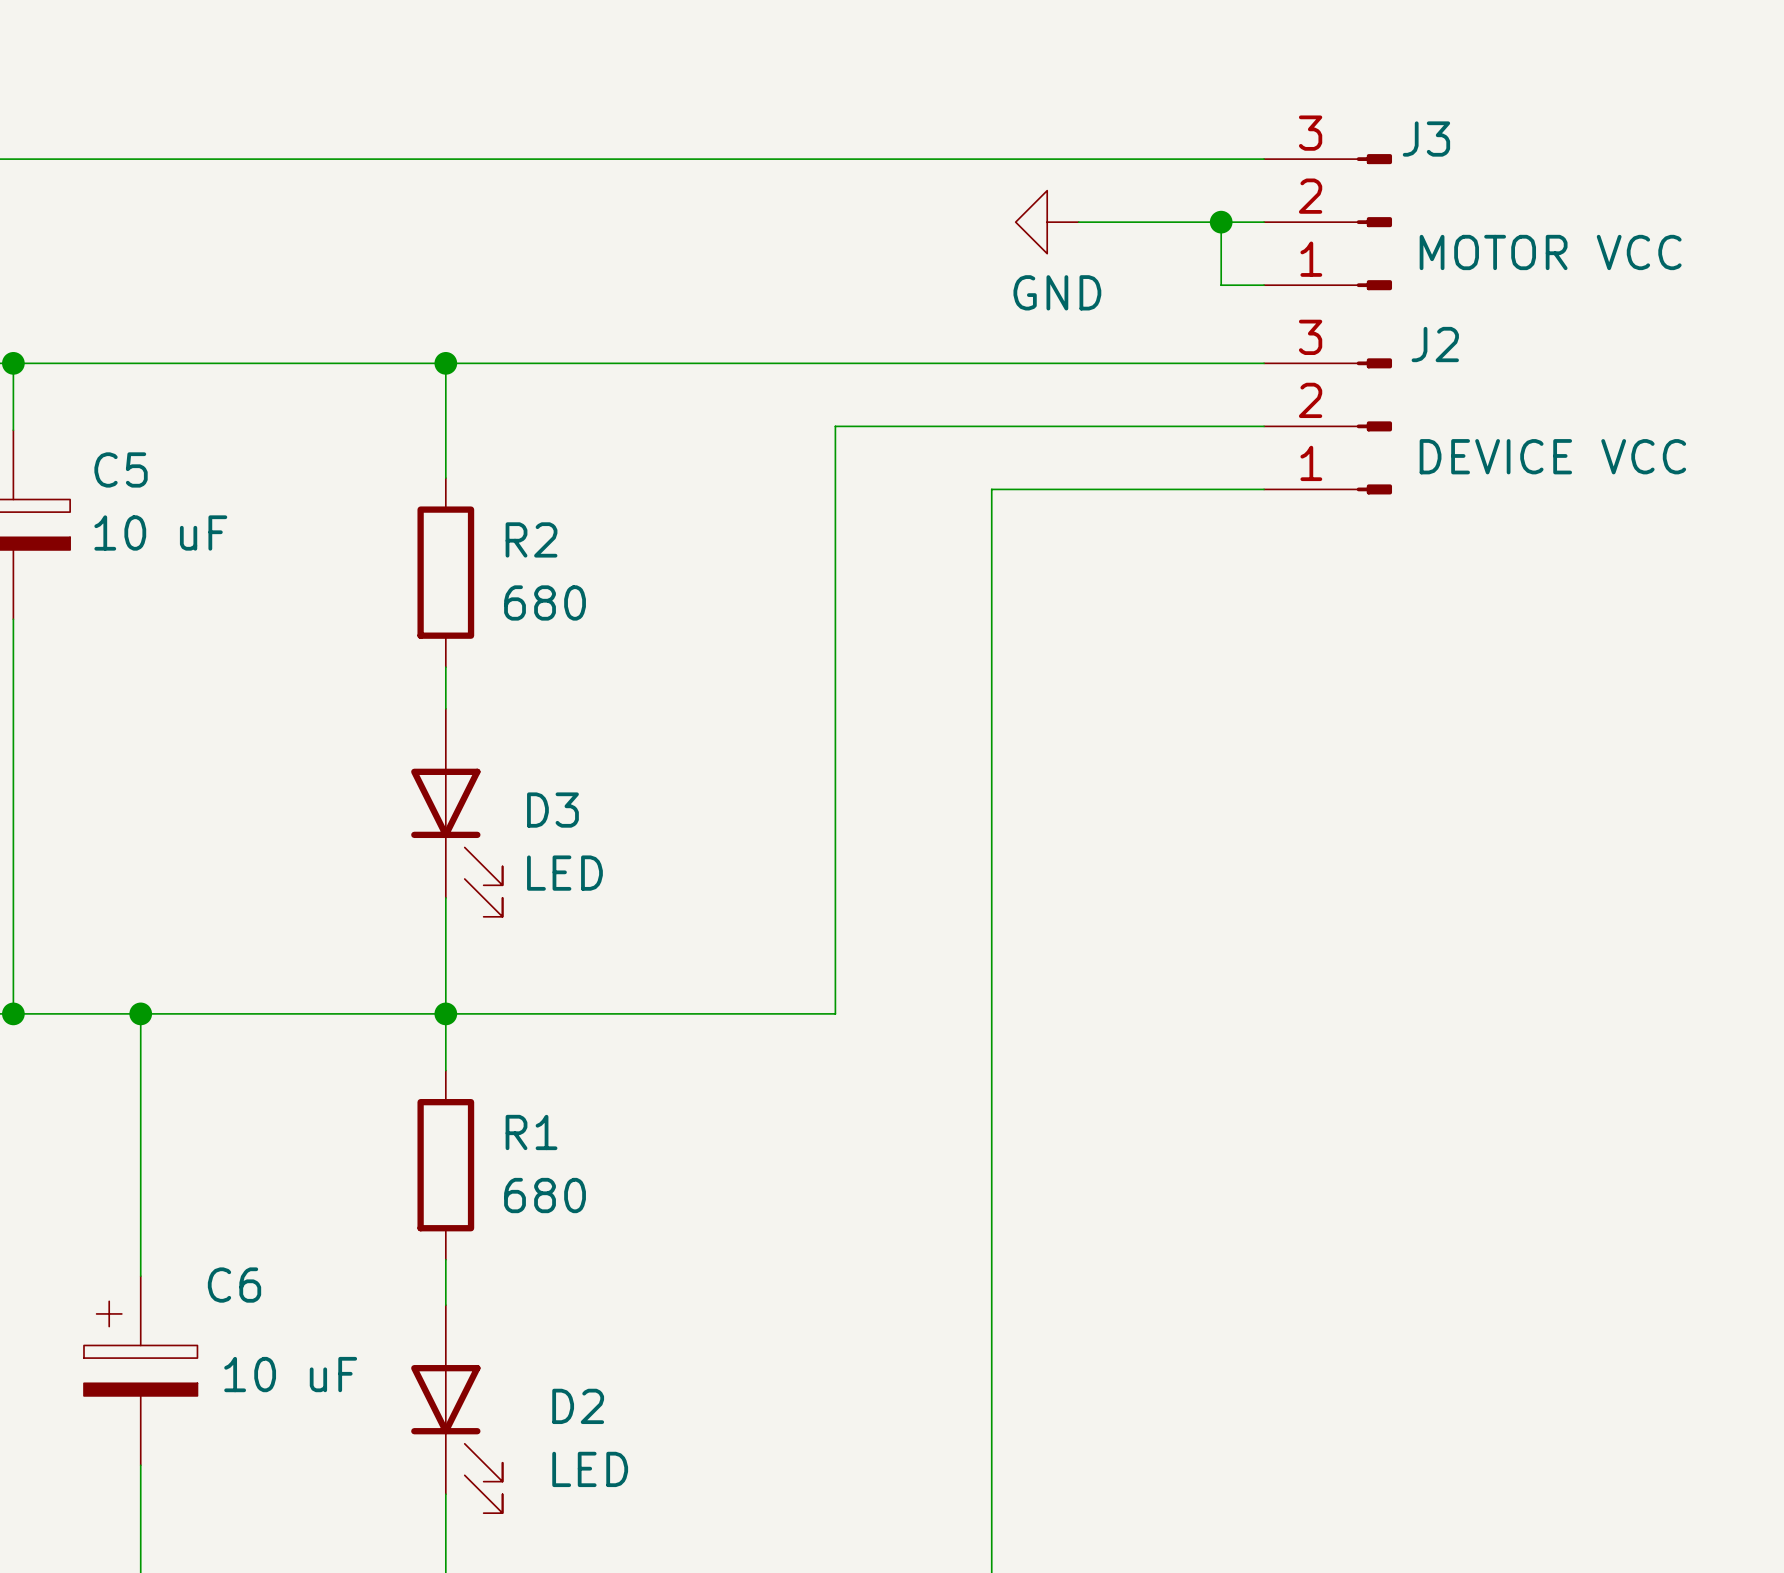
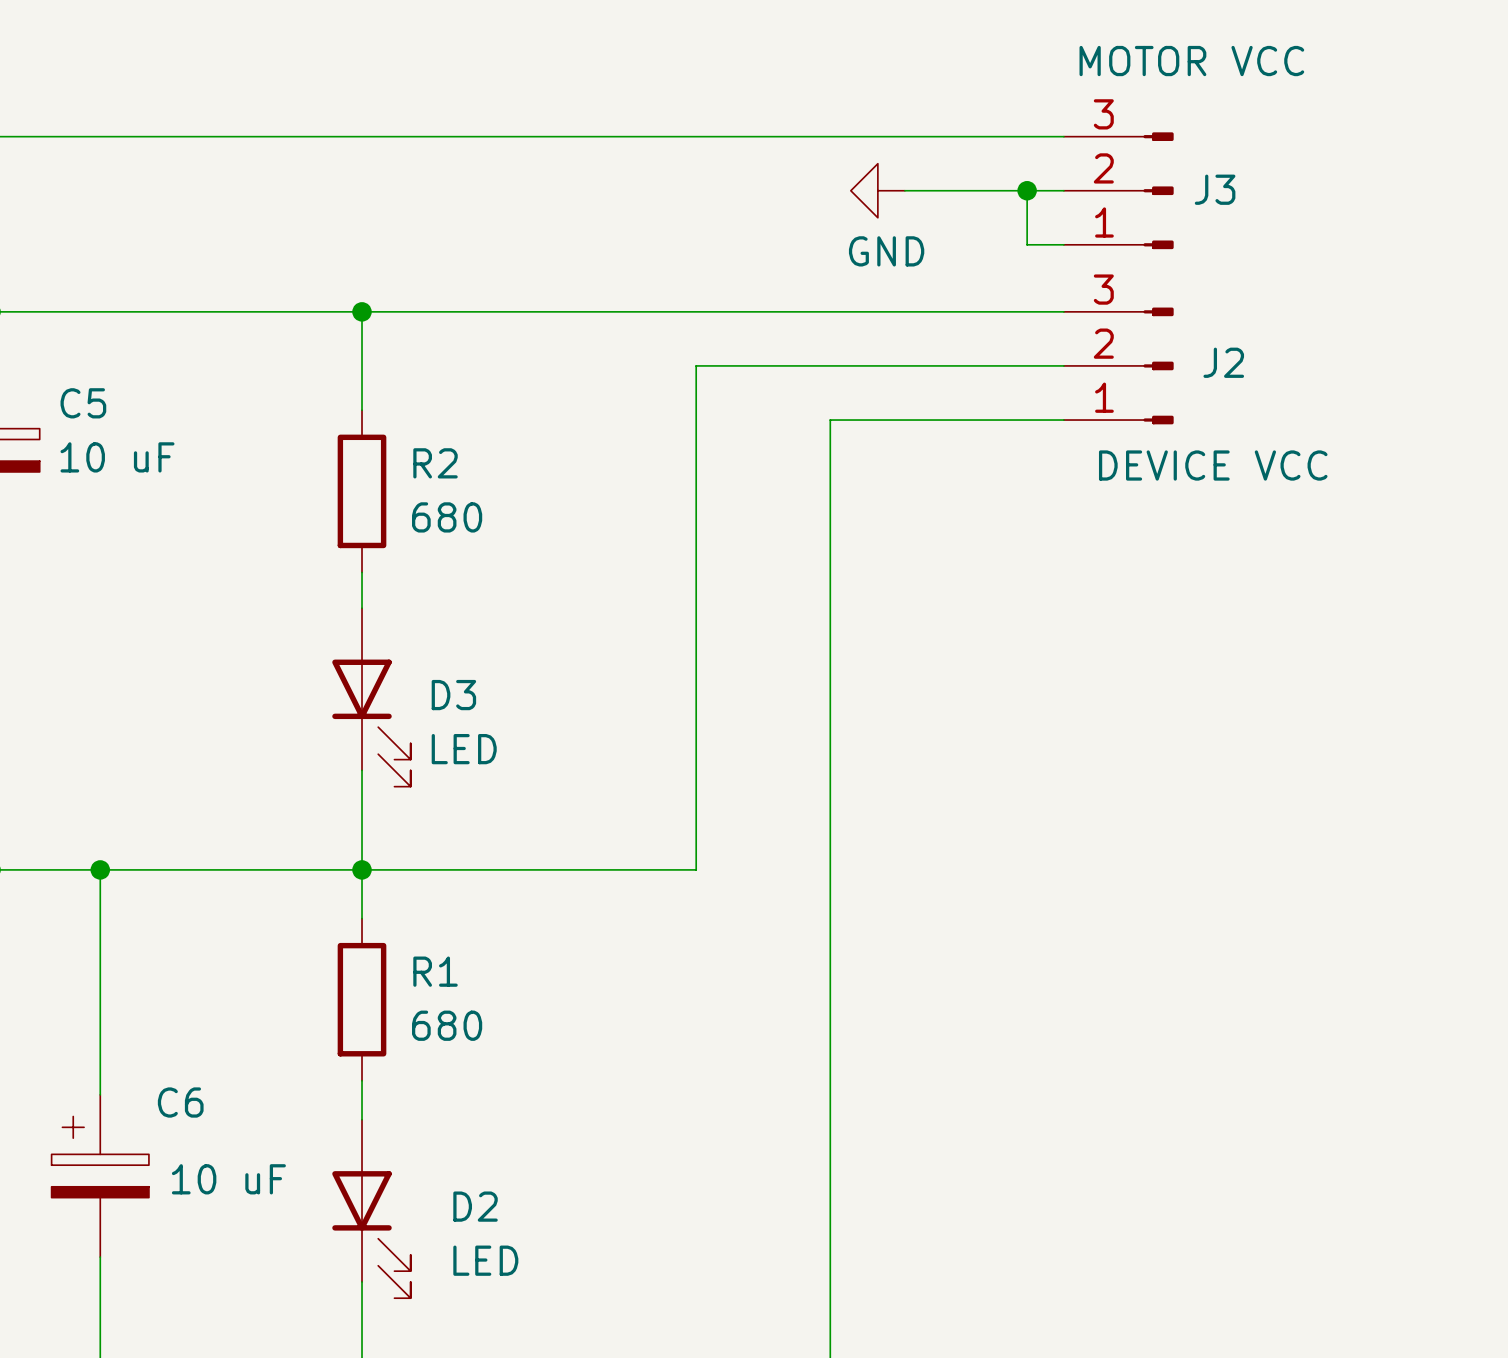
J3 name position: J3 (1426, 139) -> J3 (1215, 189)
J3 value position: MOTOR VCC (1550, 252) -> MOTOR VCC (1191, 61)
J2 name position: J2 (1435, 344) -> J2 (1223, 362)
J2 value position: DEVICE VCC (1552, 456) -> DEVICE VCC (1213, 465)

